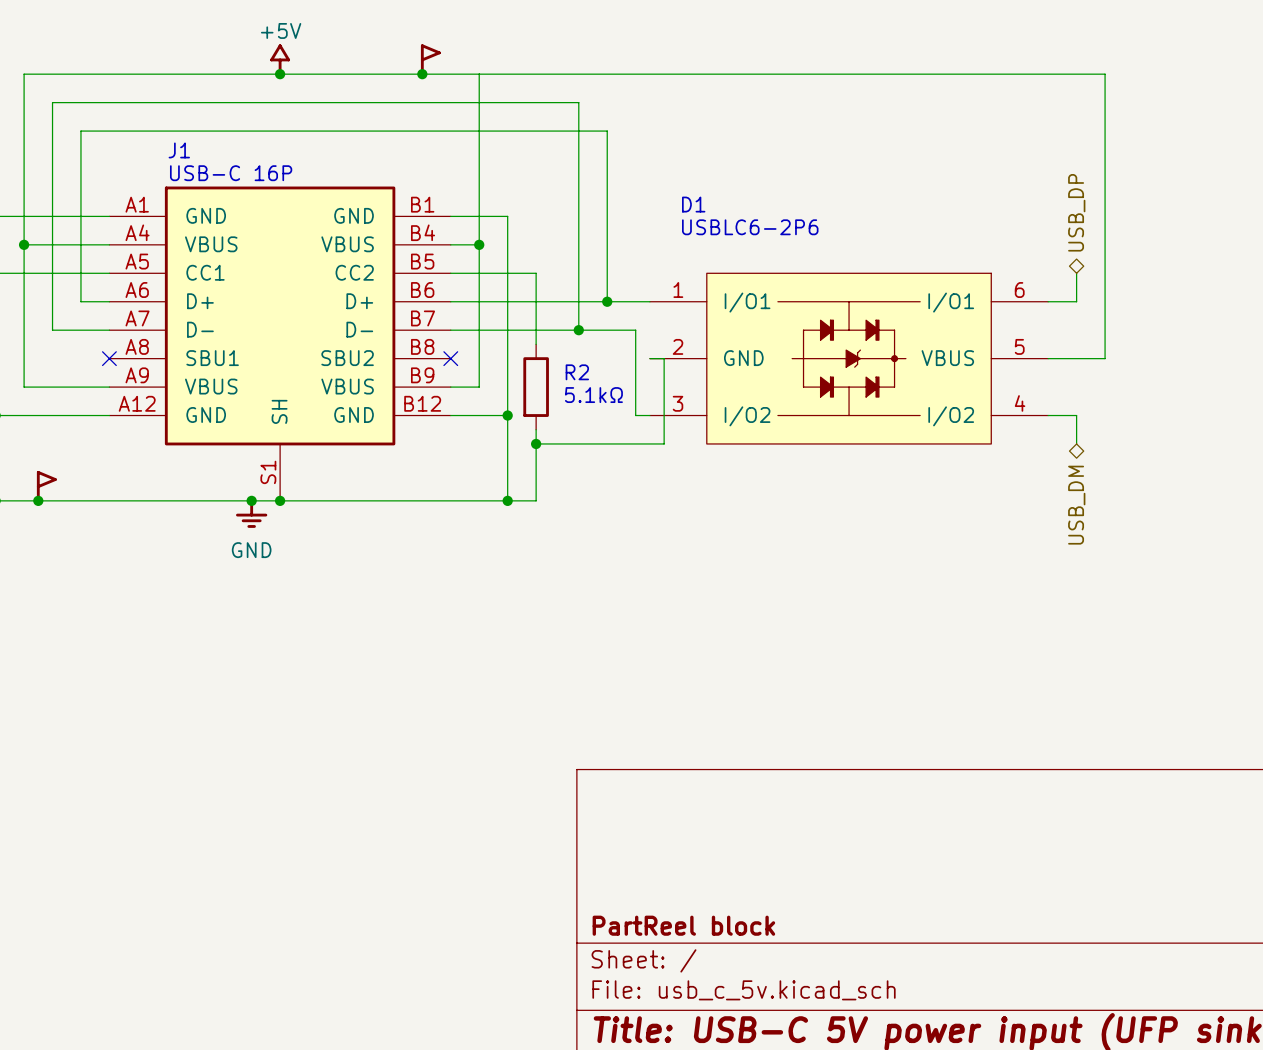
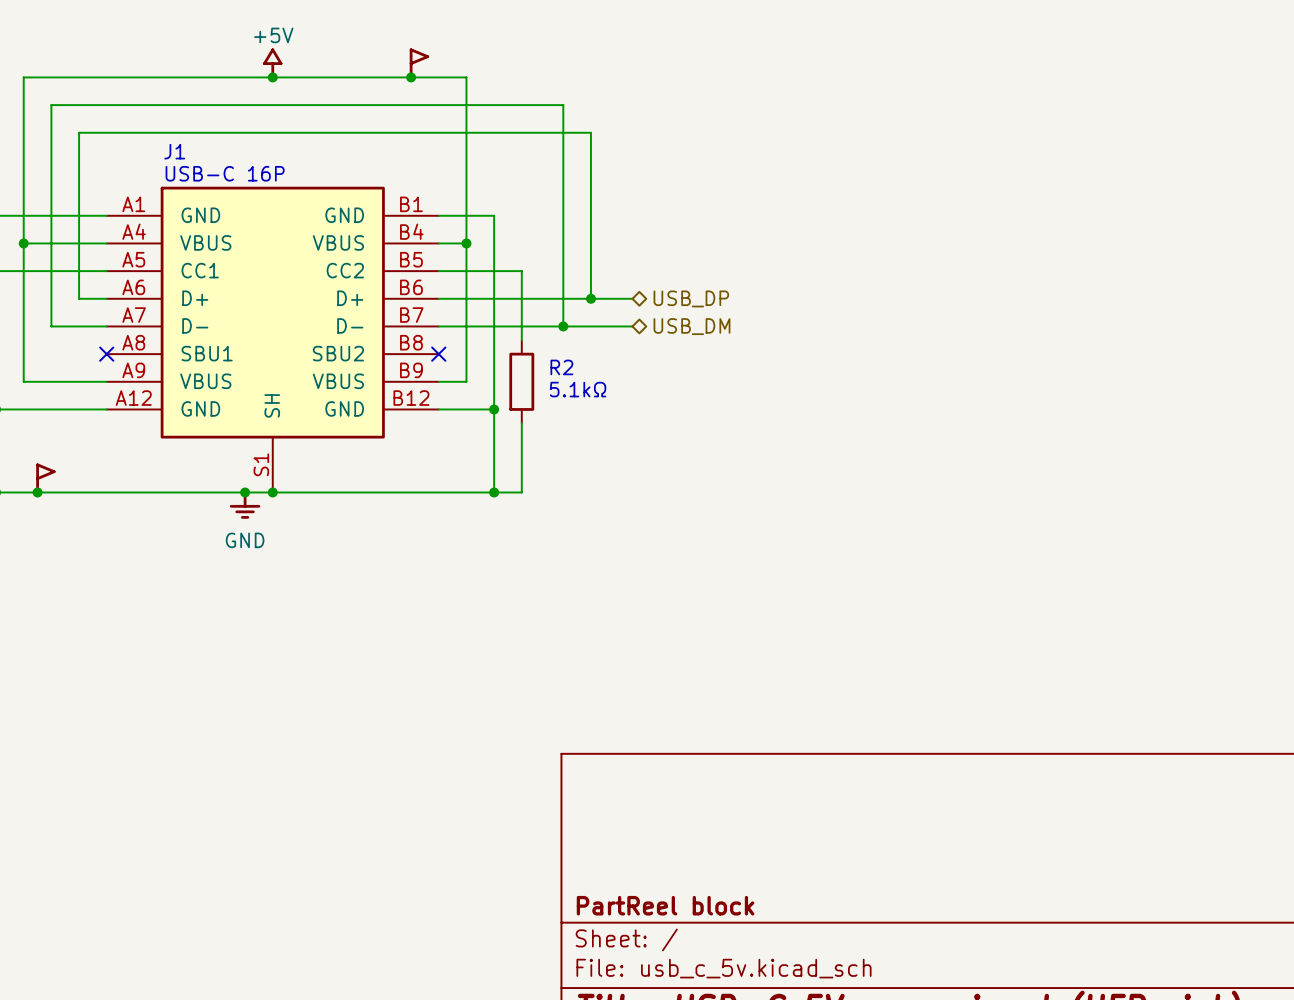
wire: (479, 74) (1105, 74) (1105, 358) (1048, 358) -> none
text: D1 (693, 204) -> none
hierarchical label: USB_DP (1076, 212) -> none
text: USBLC6-2P6 (750, 227) -> none
wire: (1076, 273) (1076, 301) (1048, 301) -> none
hierarchical label: none -> USB_DP (691, 298)
wire: (635, 330) (635, 415) (649, 415) -> (618, 326) (632, 326)
hierarchical label: none -> USB_DM (691, 326)
wire: (649, 358) (664, 358) (664, 443) (536, 443) -> none
part: (849, 358) -> none
wire: (1048, 415) (1076, 415) (1076, 443) -> none
junction: (536, 443) -> none
hierarchical label: USB_DM (1076, 505) -> none

